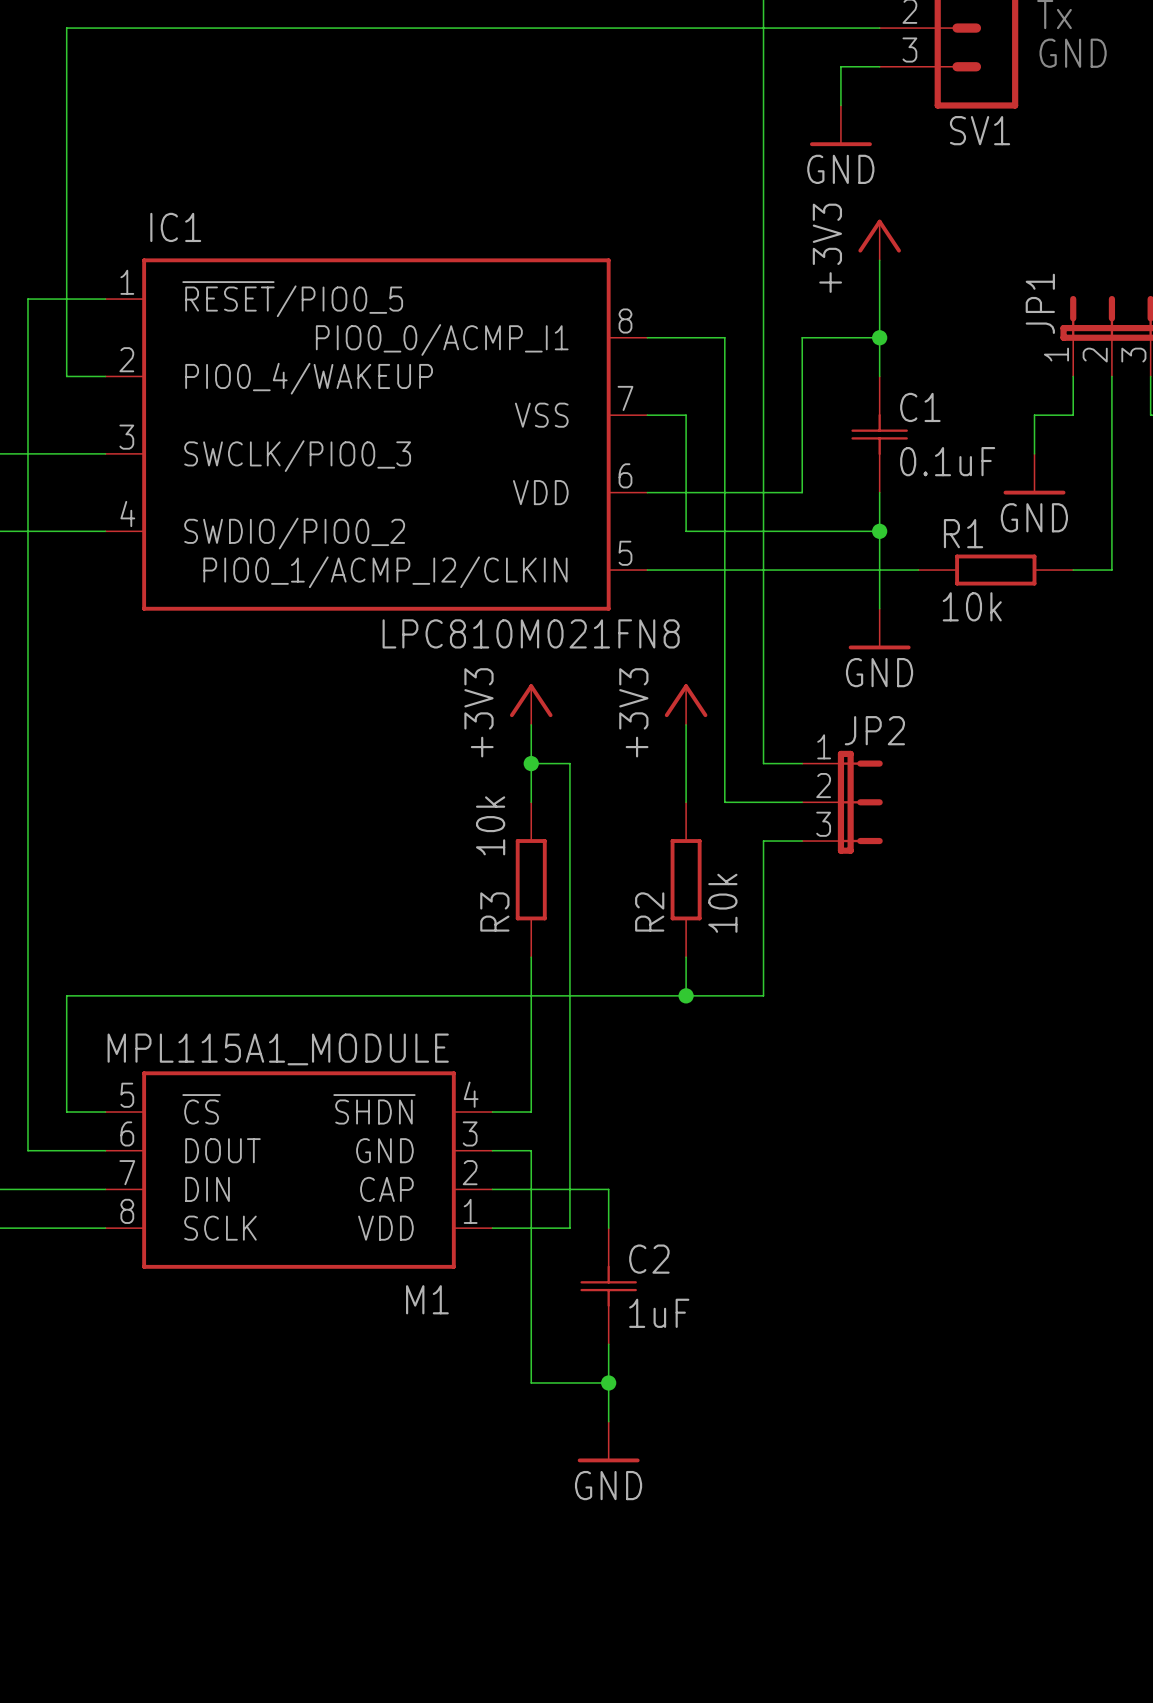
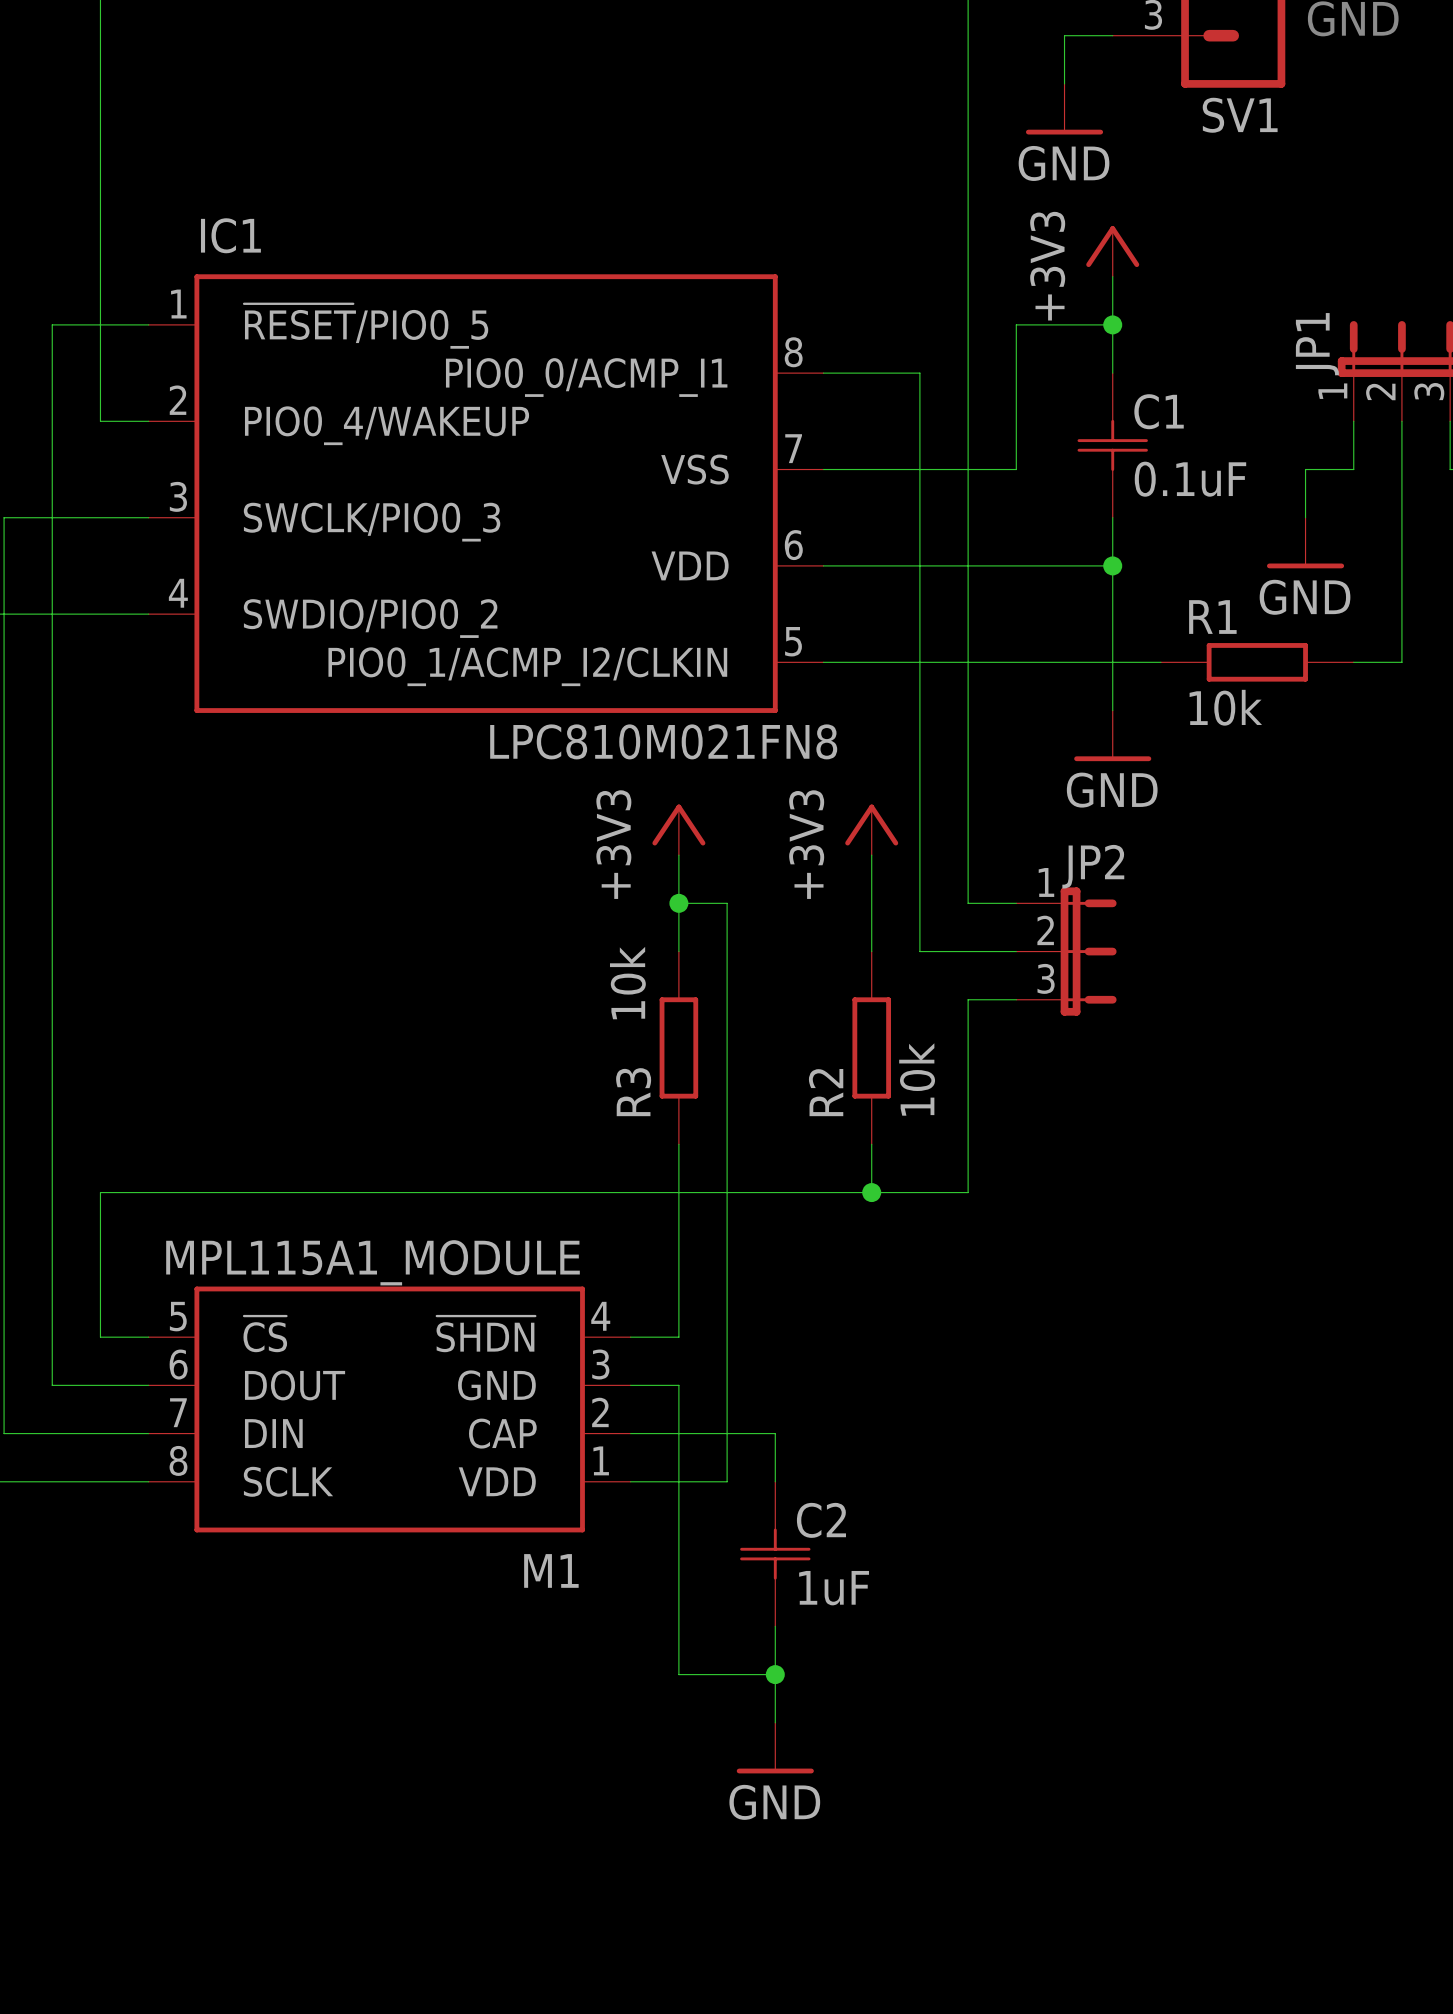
wire: (802, 337) (879, 337) (879, 376) -> (1016, 373) (1016, 324) (1112, 324)
junction position: (879, 337) -> (1112, 324)
wire: (686, 415) (686, 531) (879, 531) -> (871, 469) (1016, 469)
wire: (802, 415) (802, 492) -> (1112, 517) (1112, 565) (1016, 565)
C1 position: (879, 434) -> (1112, 445)
junction position: (879, 531) -> (1112, 565)

